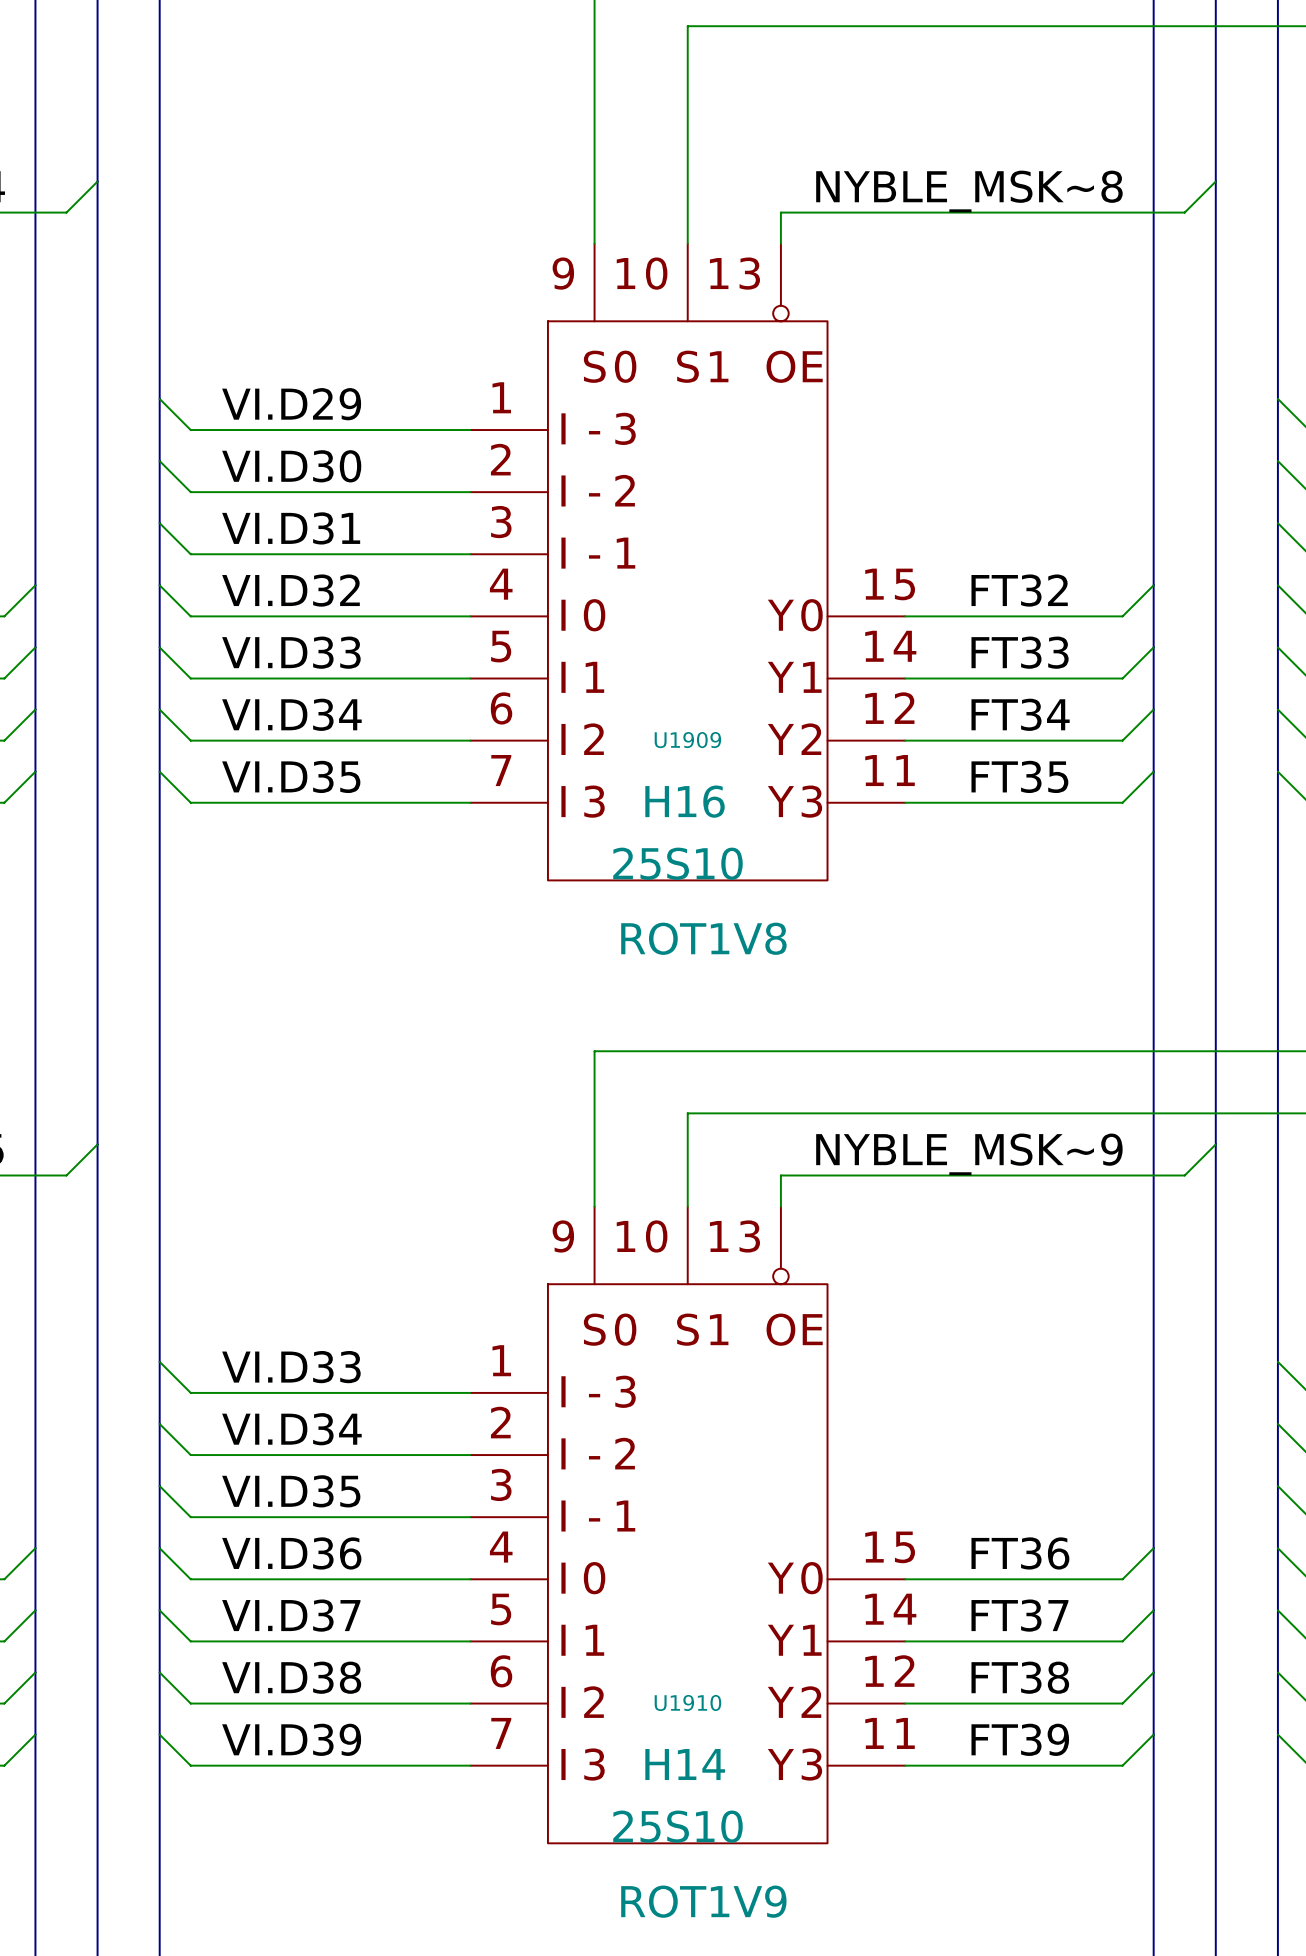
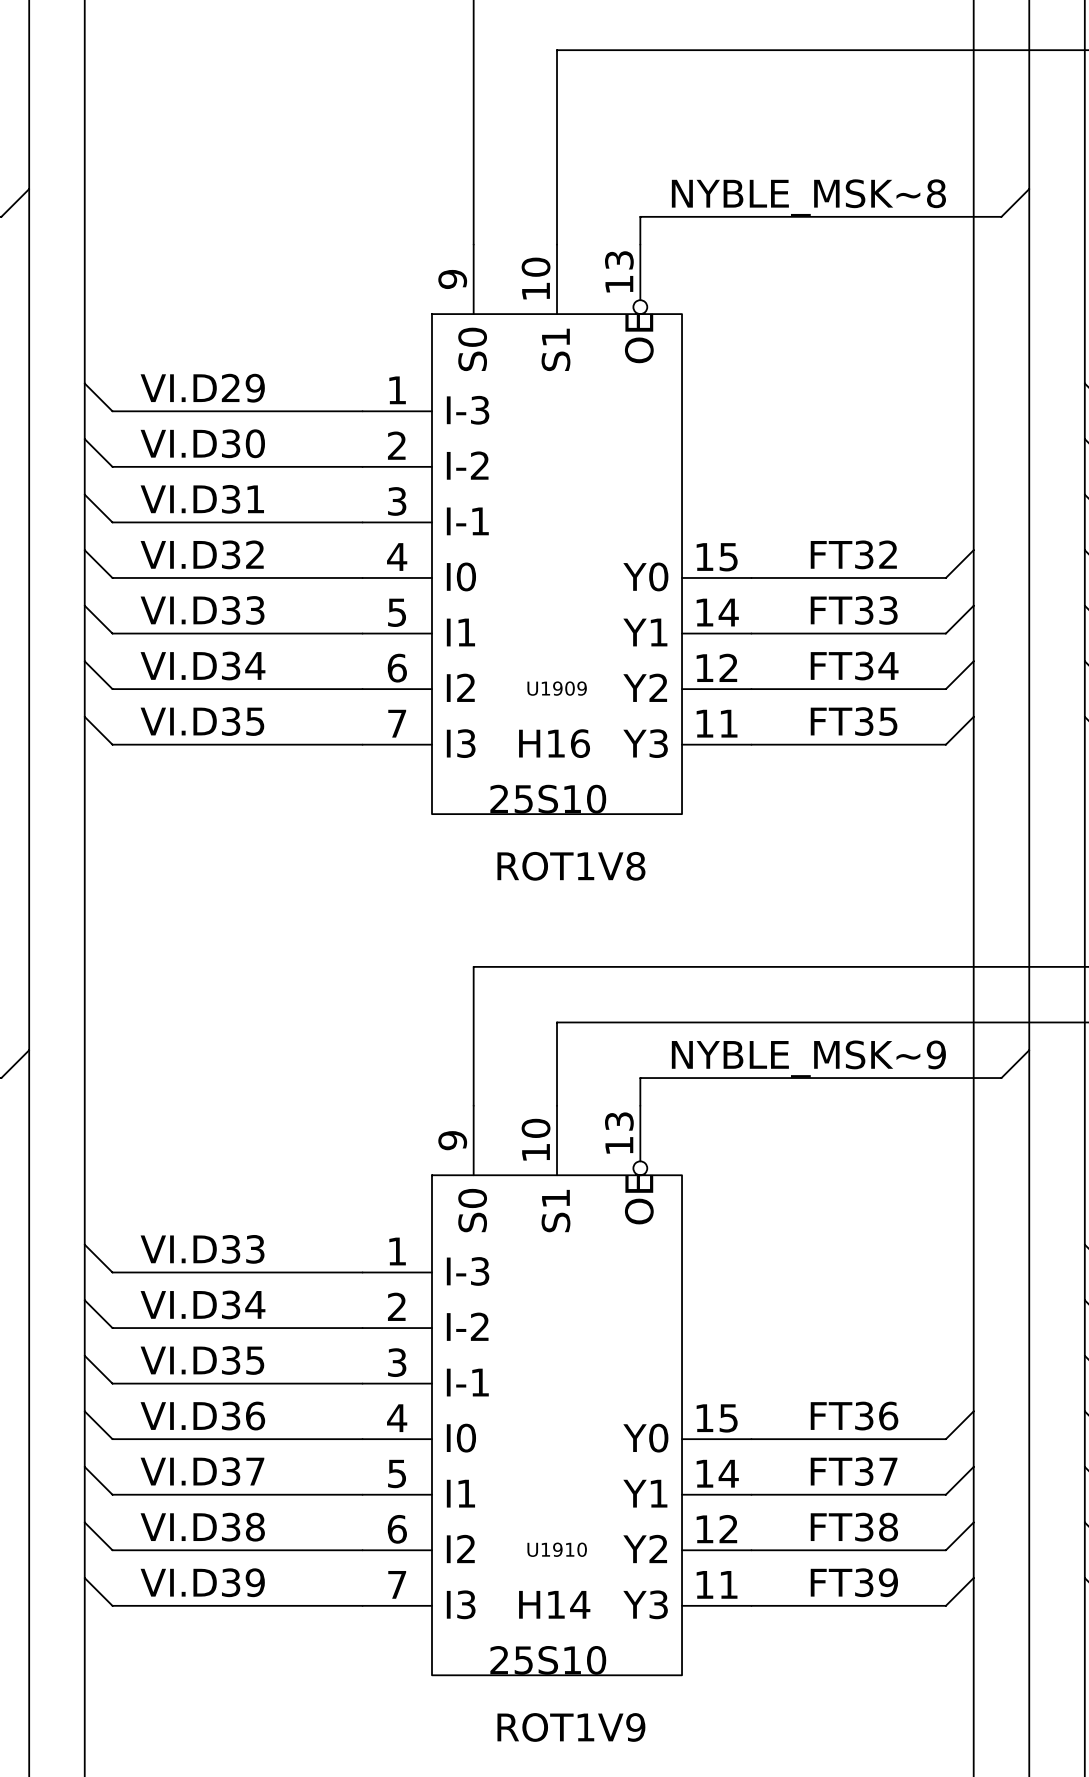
U1909 symbol: [470, 243, 906, 881] -> [362, 244, 752, 815]
U1910 symbol: [470, 1206, 906, 1844] -> [362, 1105, 752, 1676]

